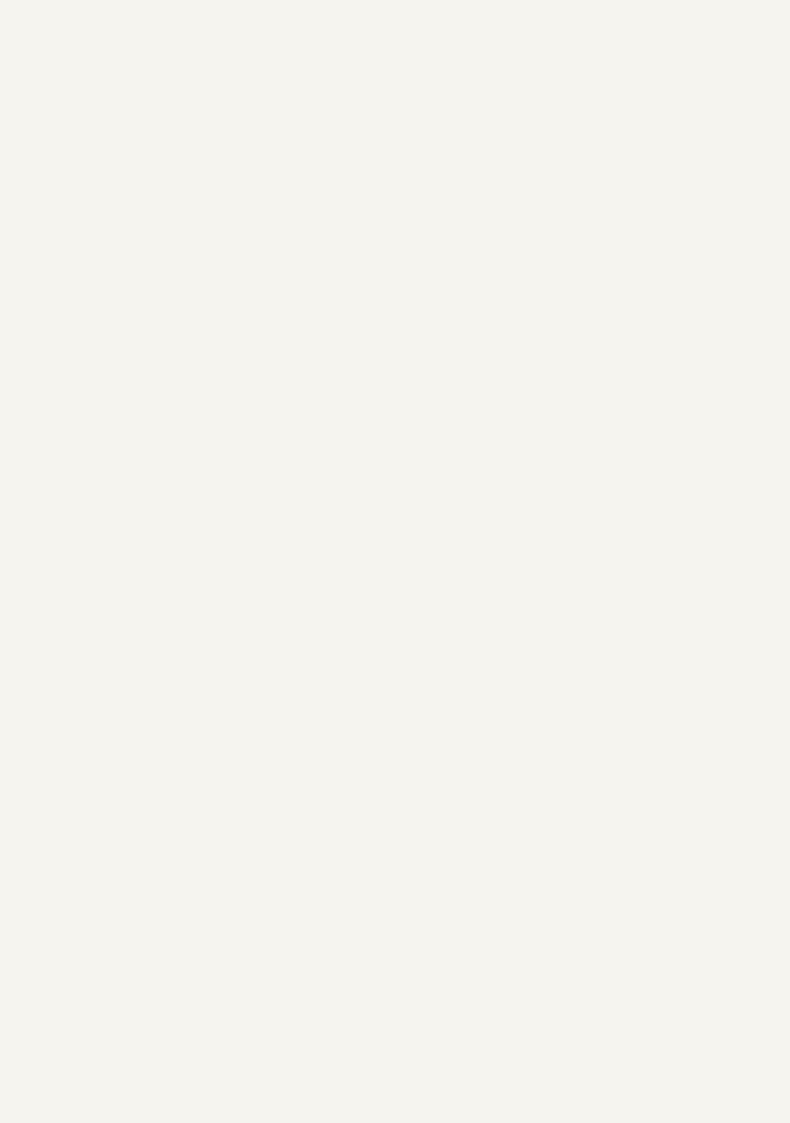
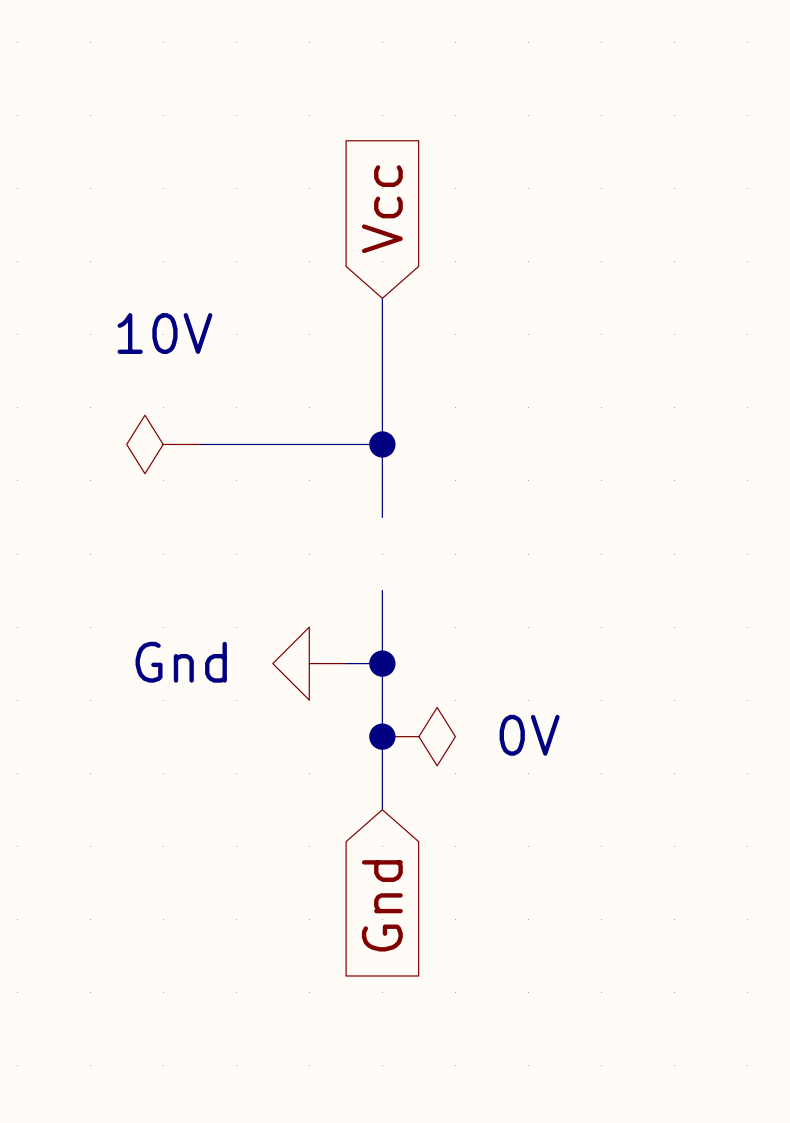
global label: none -> Vcc (382, 209)
wire: none -> (382, 298) (382, 517)
power symbol: none -> 10V (163, 444)
wire: none -> (199, 444) (382, 444)
junction: none -> (382, 444)
wire: none -> (382, 590) (382, 809)
power symbol: none -> Gnd (309, 663)
wire: none -> (345, 663) (382, 663)
junction: none -> (382, 663)
junction: none -> (382, 736)
power symbol: none -> 0V (418, 736)
global label: none -> Gnd (382, 905)

